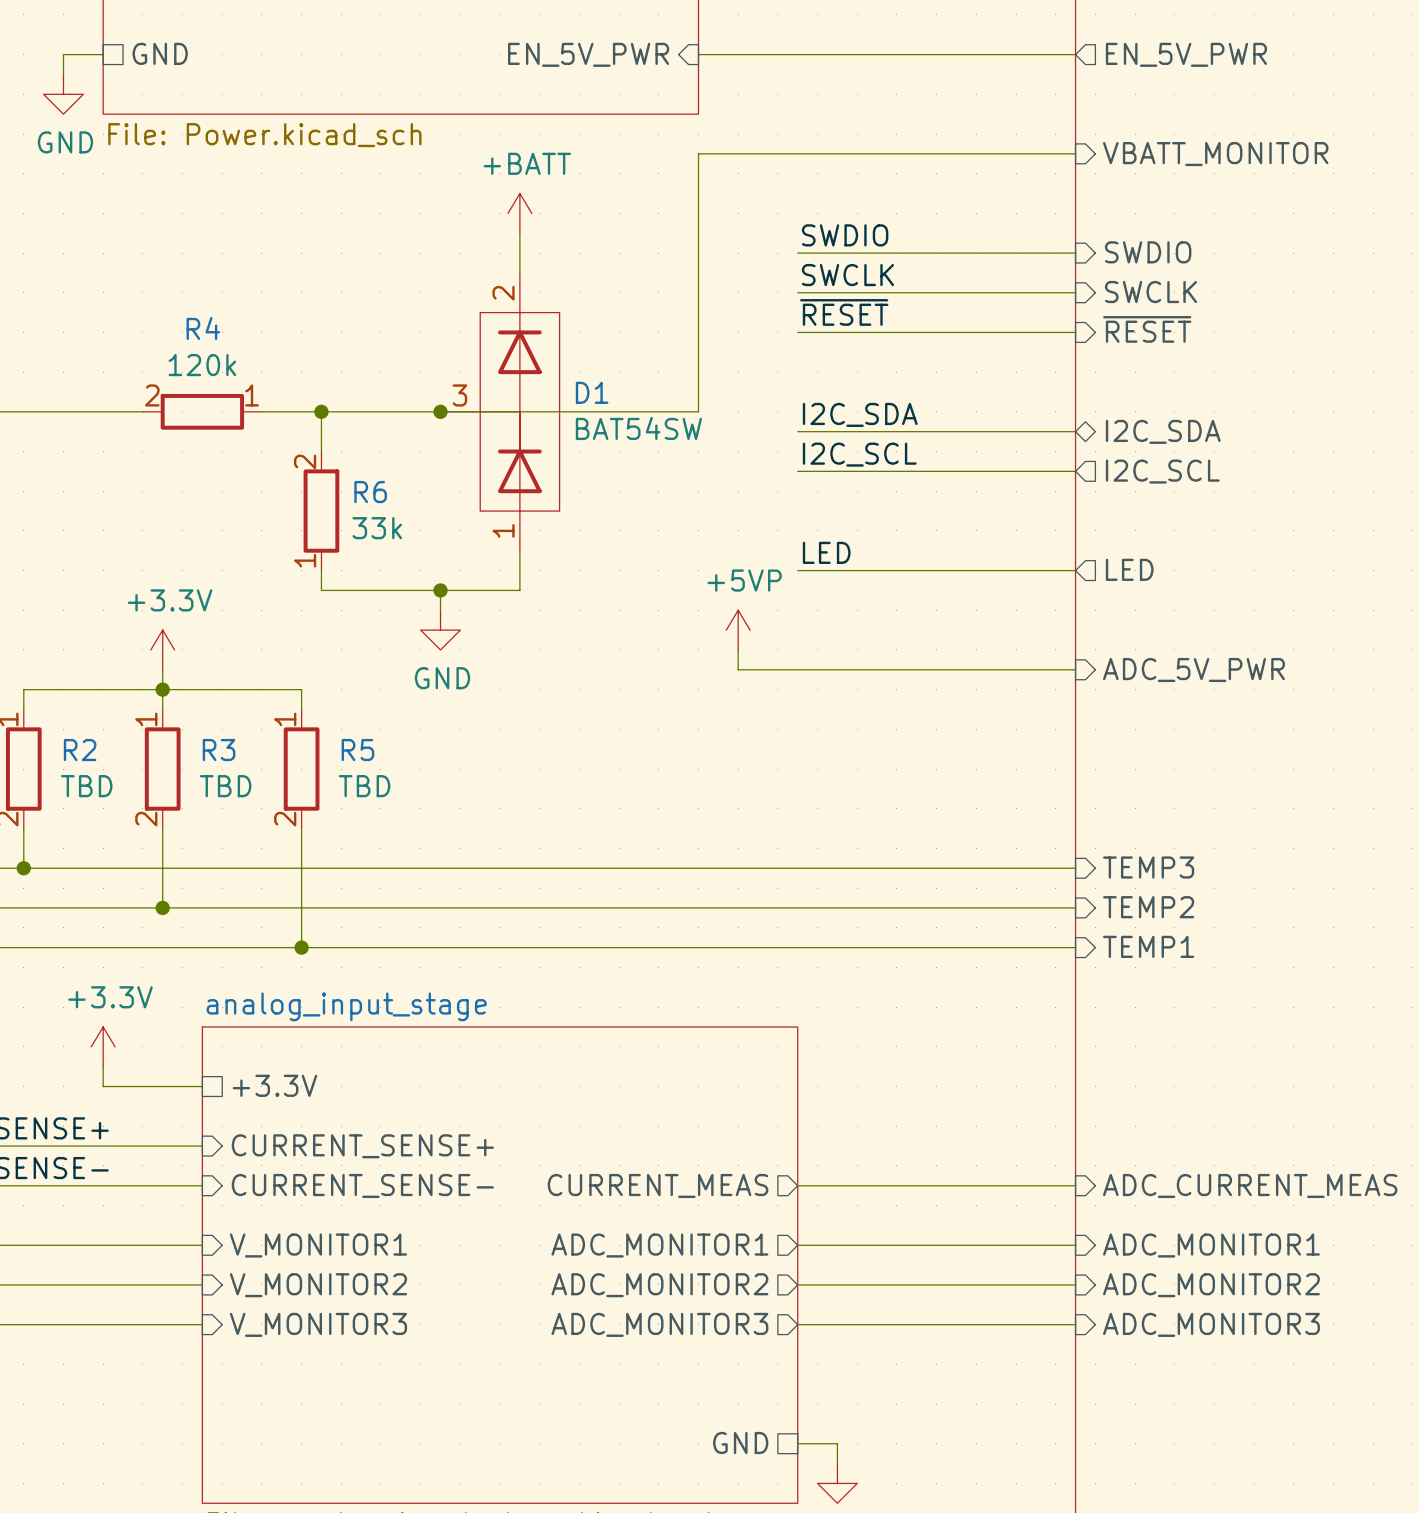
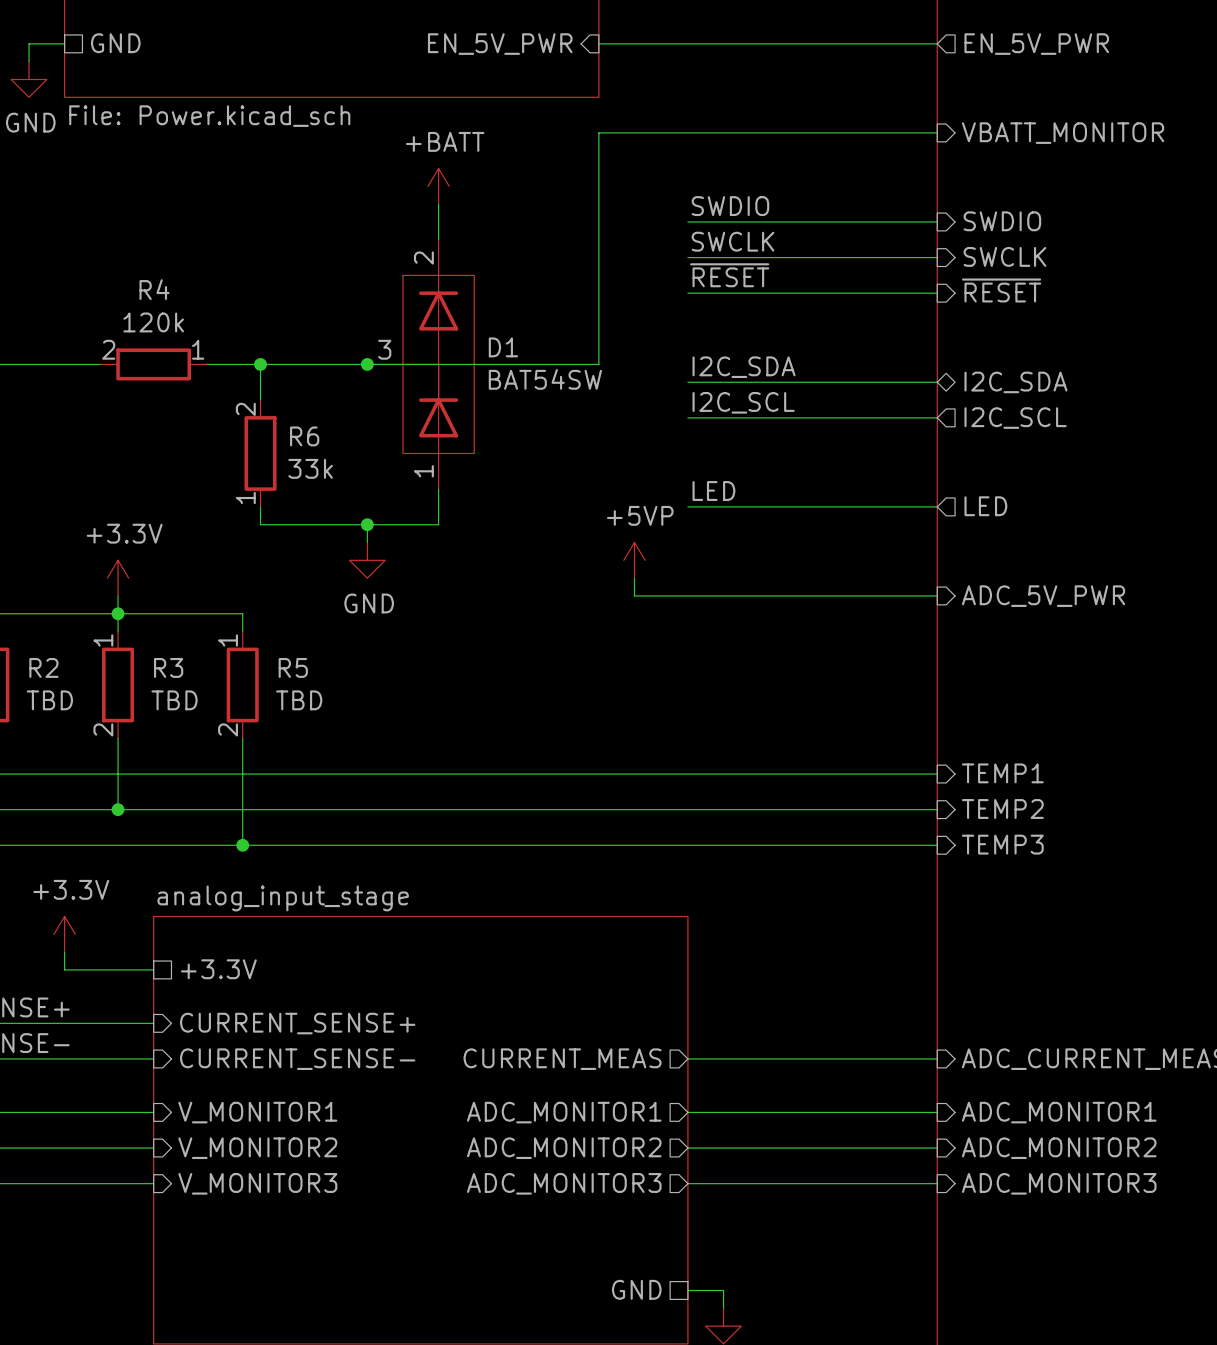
sheet pin: TEMP3 (1148, 867) -> TEMP1 (1002, 773)
sheet pin: TEMP1 (1148, 946) -> TEMP3 (1002, 844)

